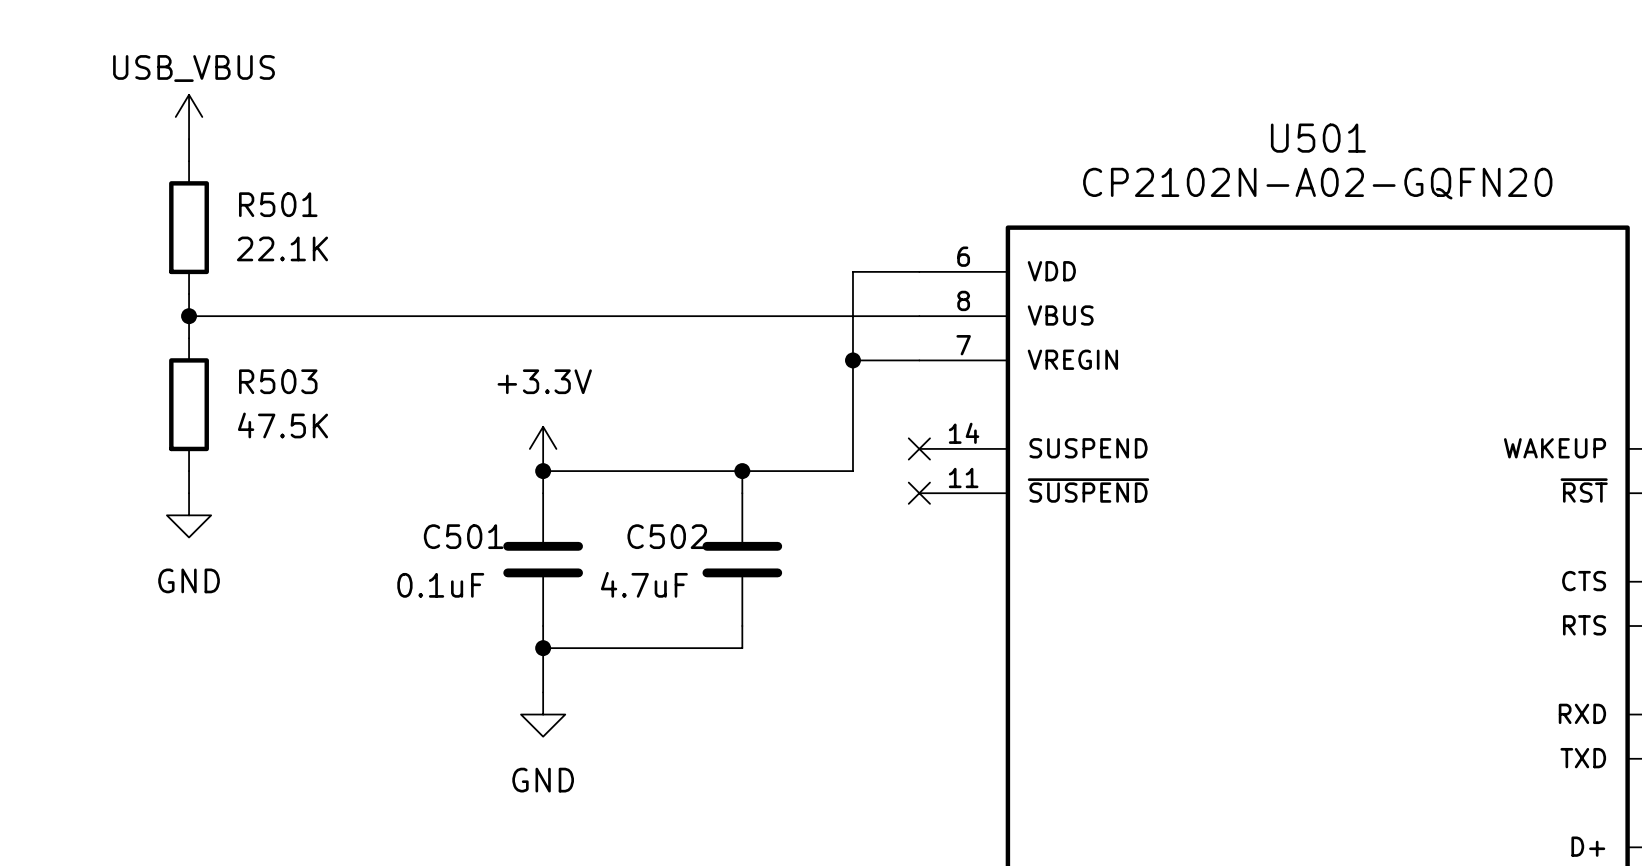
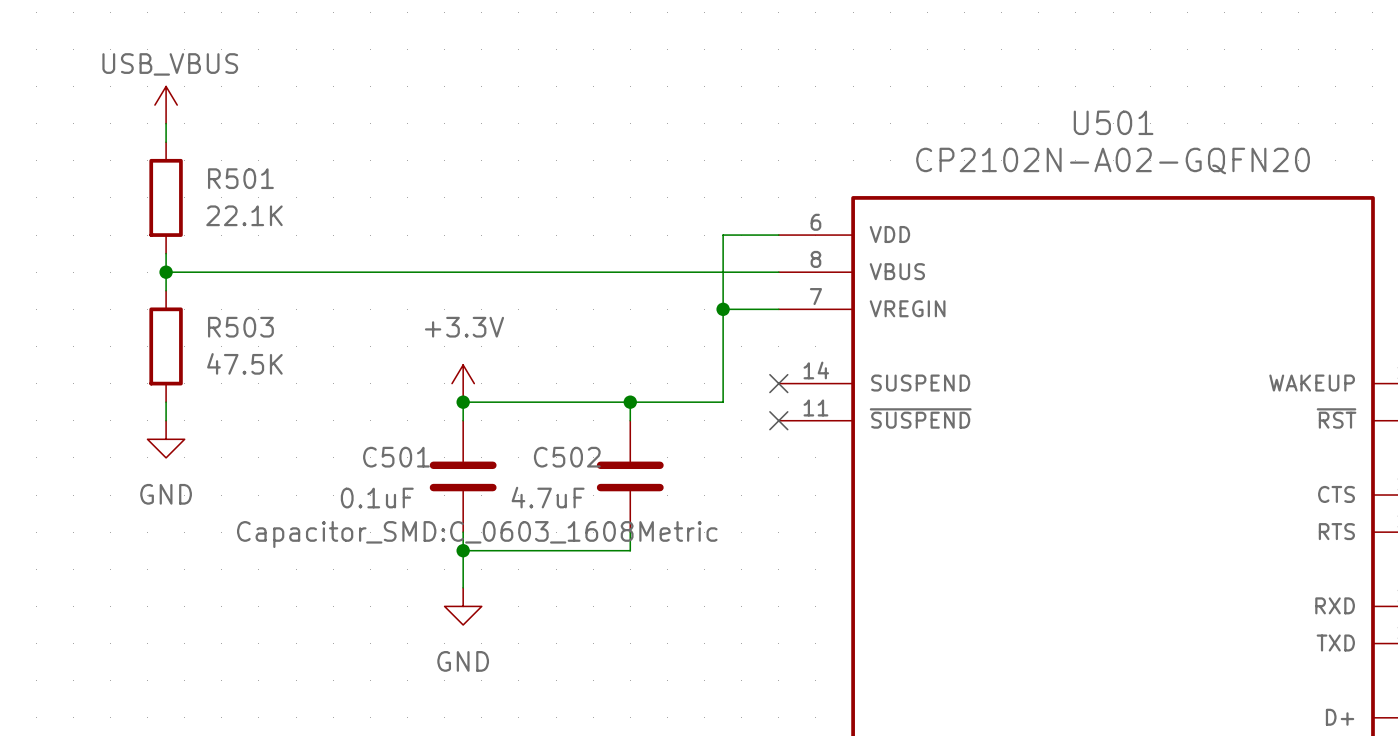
C501 text: none -> Capacitor_SMD:C_0603_1608Metric (477, 534)

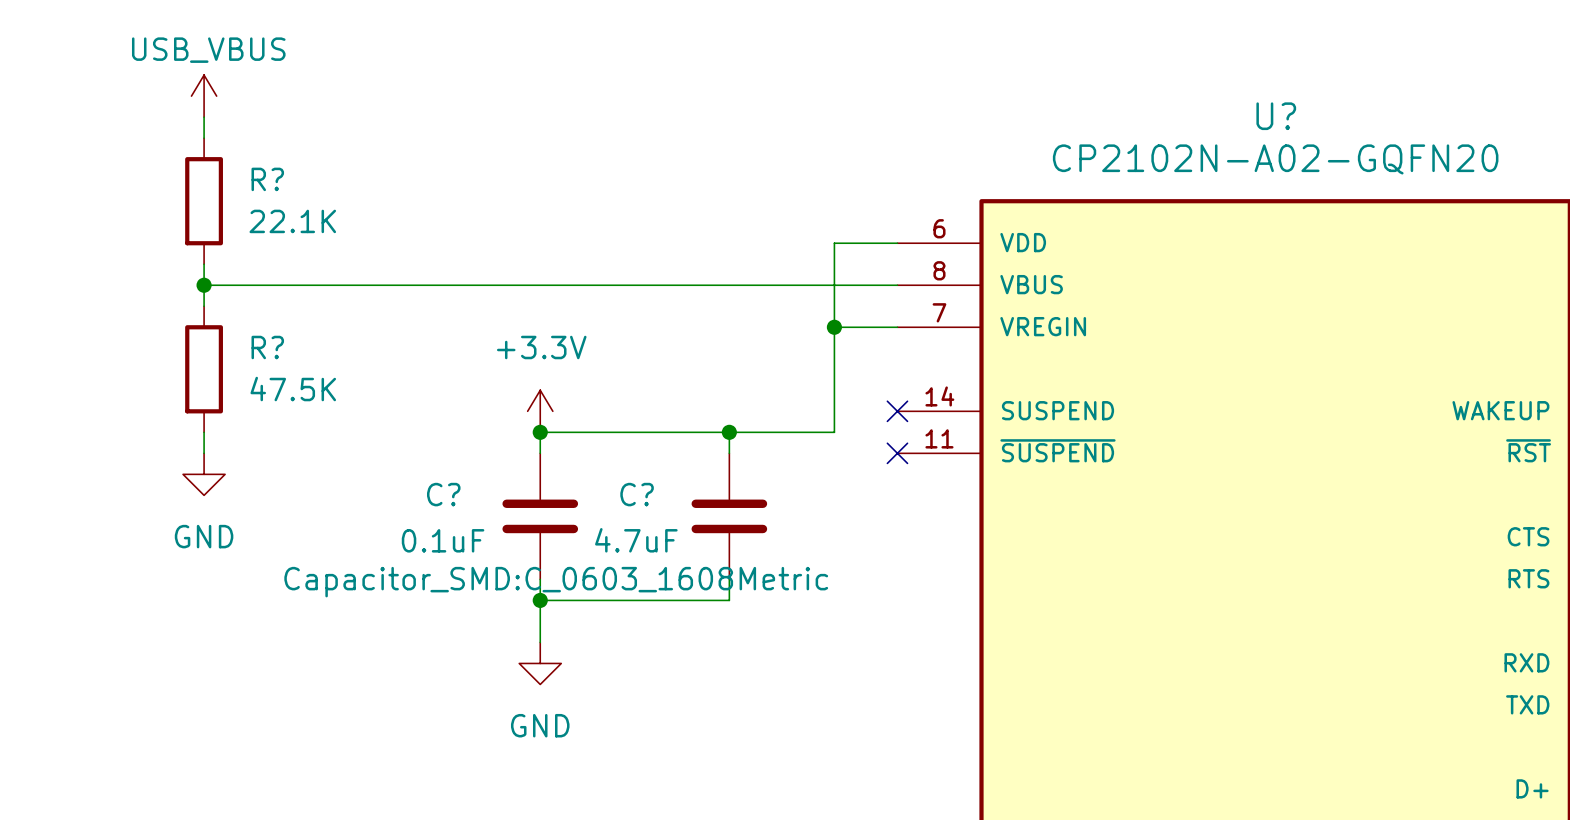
U501 name: U501 (1113, 122) -> U? (1276, 116)
R501 name: R501 (240, 178) -> R? (267, 179)
R503 name: R503 (240, 327) -> R? (267, 347)
C501 name: C501 (396, 457) -> C? (443, 494)
C502 name: C502 (567, 457) -> C? (637, 494)

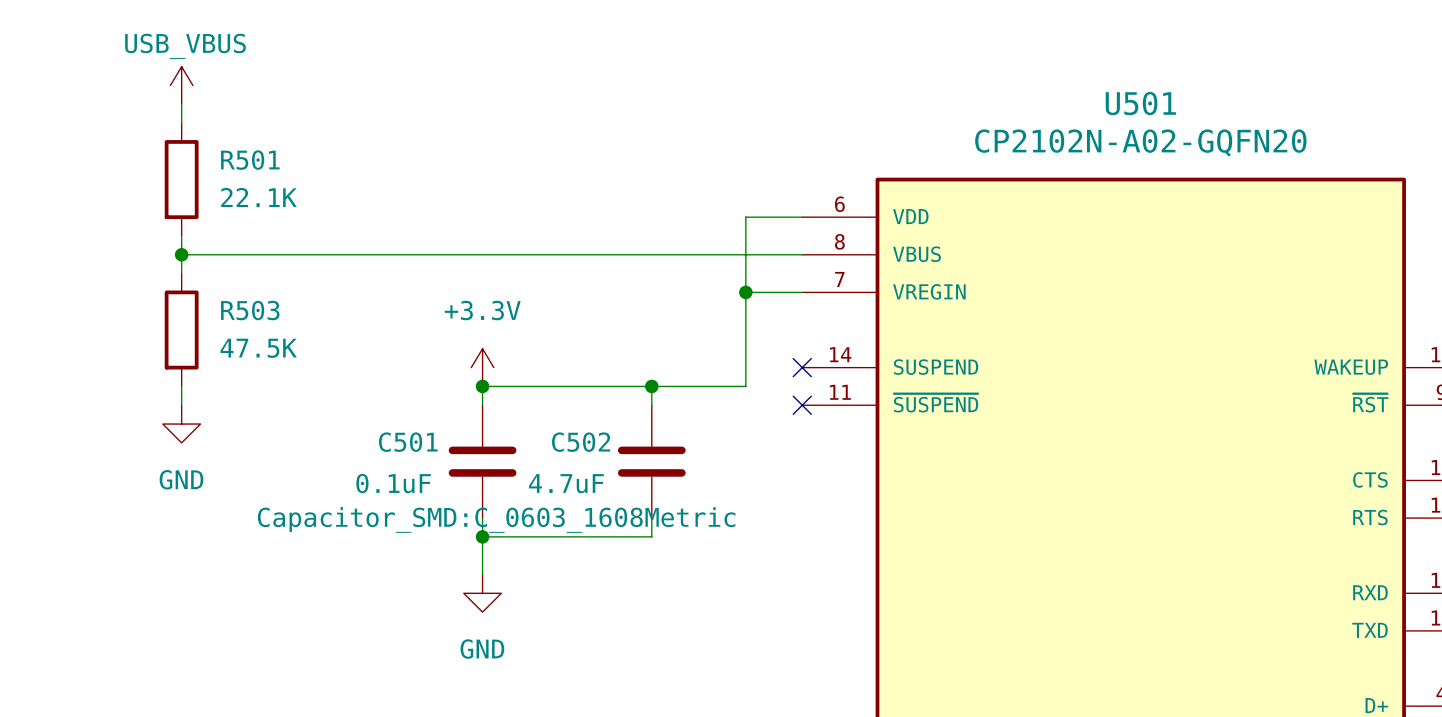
U? name: U? (1276, 116) -> U501 (1140, 103)
R? name: R? (267, 179) -> R501 (250, 160)
R? name: R? (267, 347) -> R503 (250, 310)
C? name: C? (443, 494) -> C501 (408, 442)
C? name: C? (637, 494) -> C502 (581, 442)

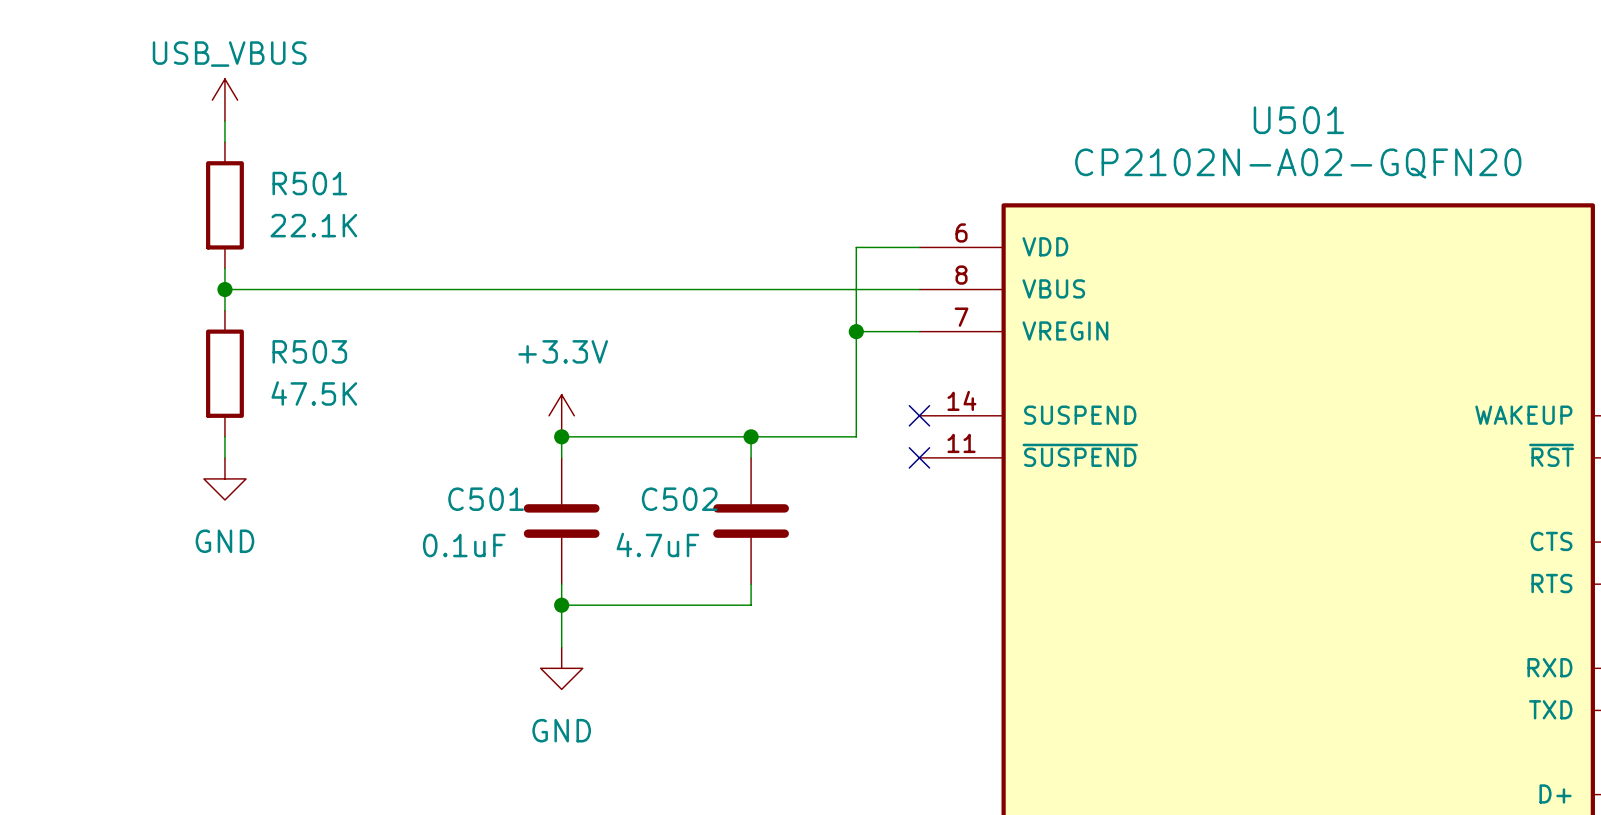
C501 text: Capacitor_SMD:C_0603_1608Metric (496, 520) -> none

